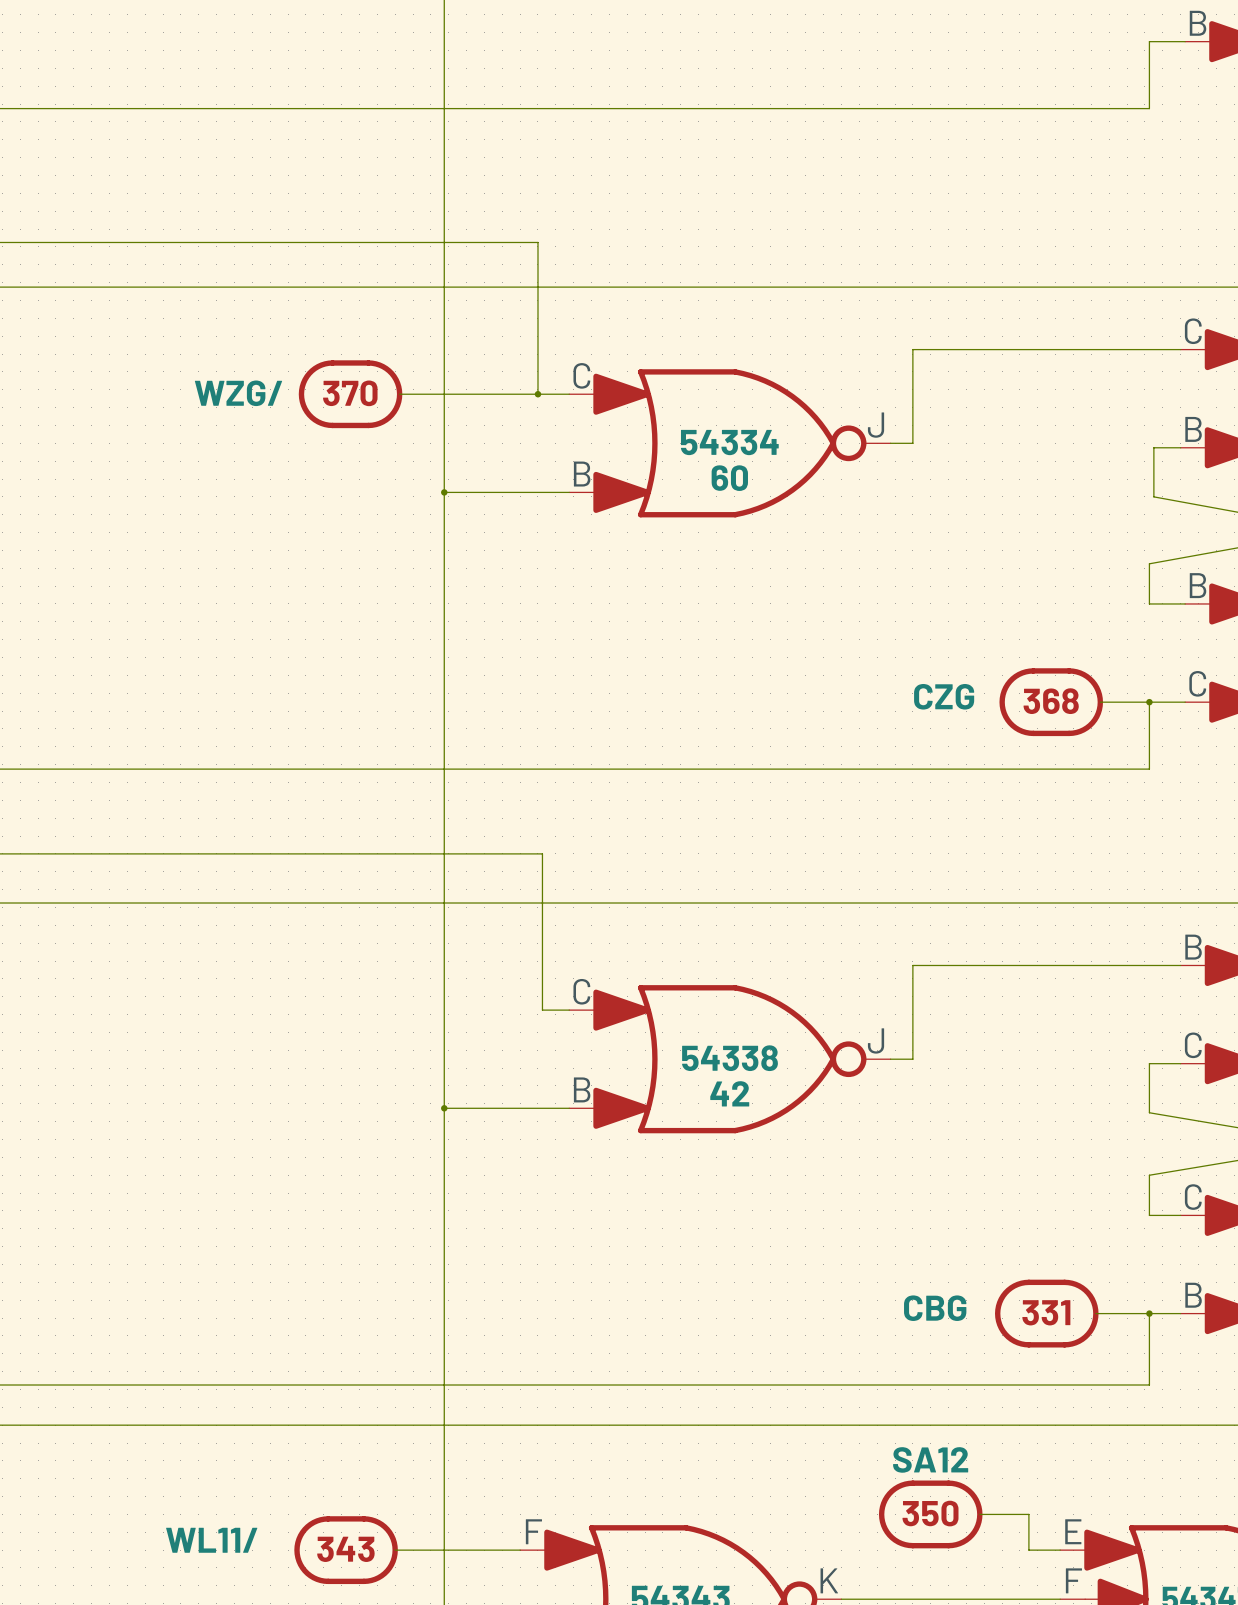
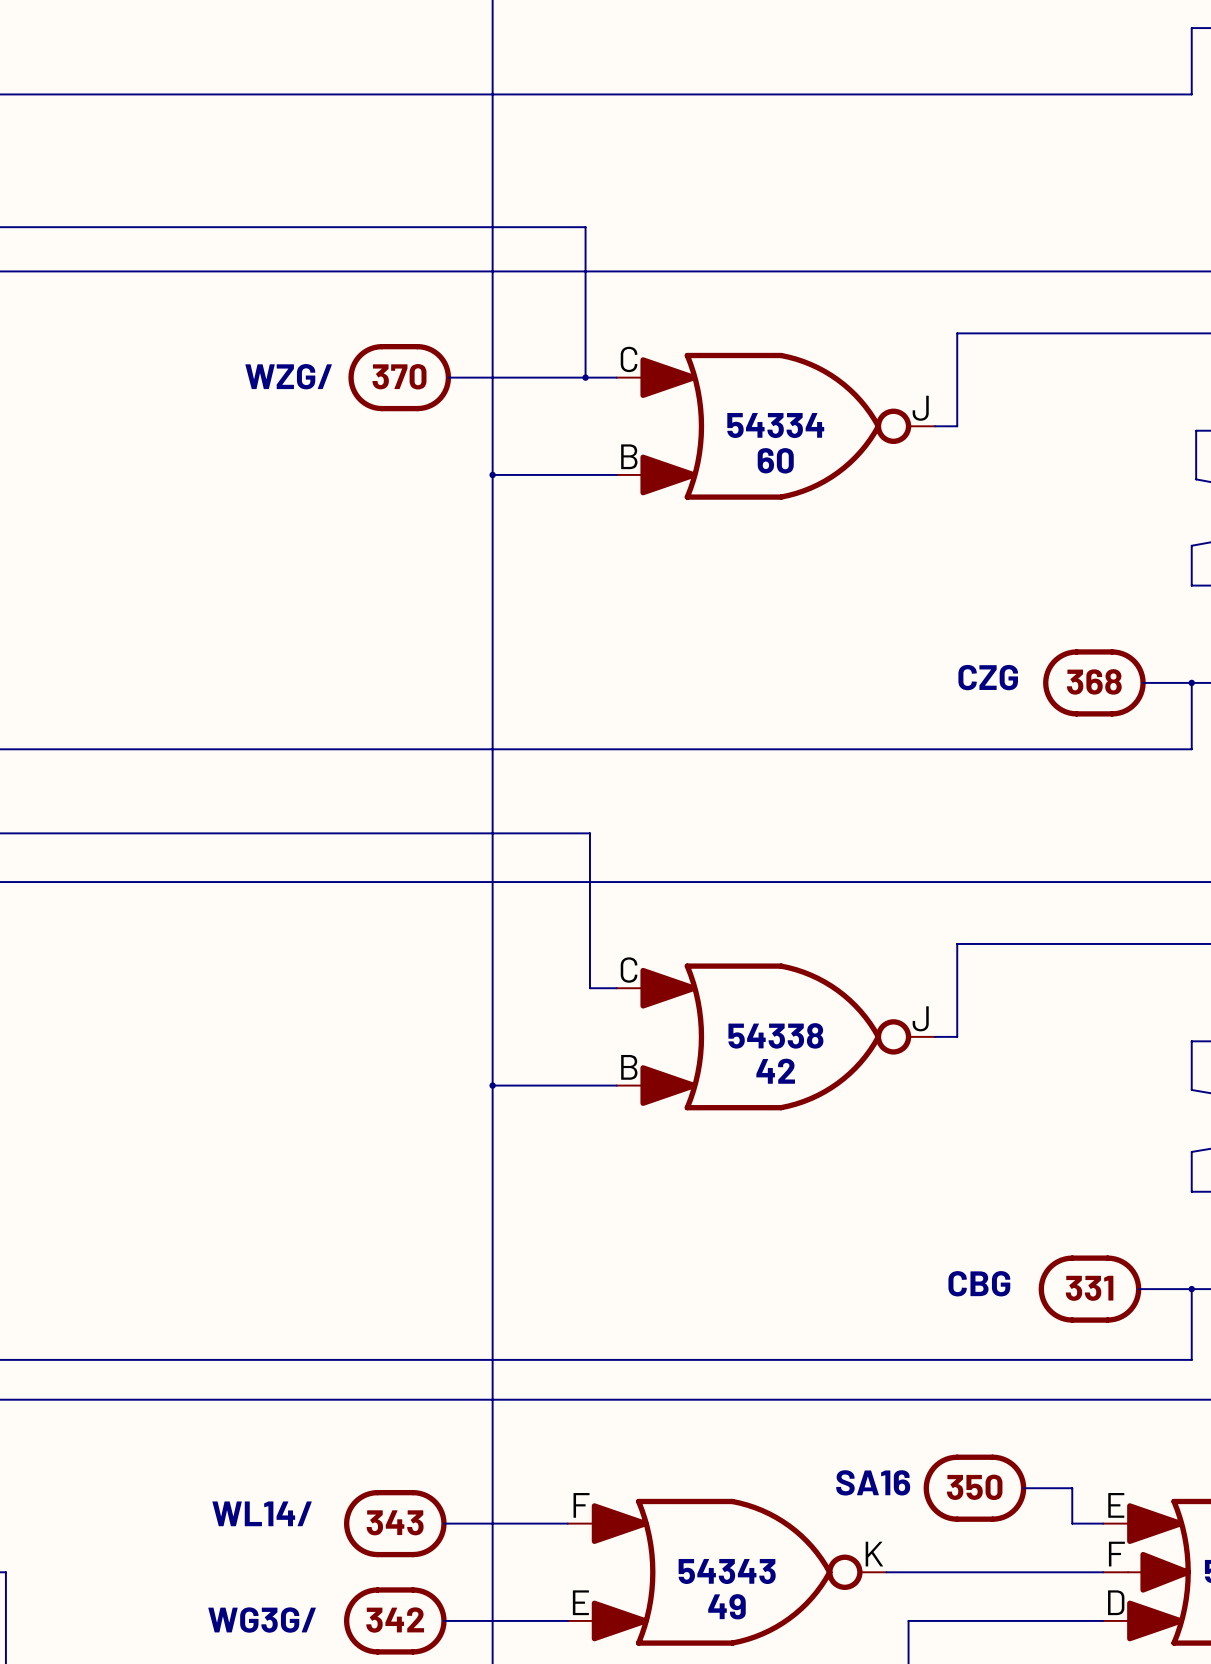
part text: SA12 (930, 1459) -> SA16 (873, 1482)
part text: WL11/ (211, 1540) -> WL14/ (262, 1513)

